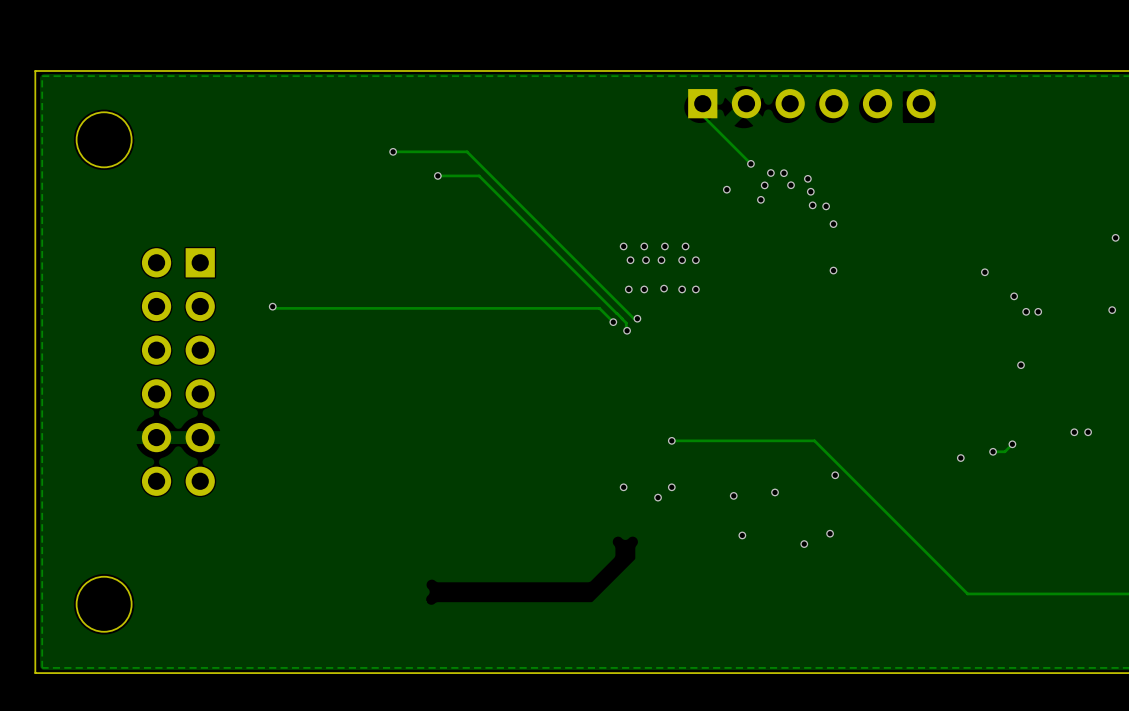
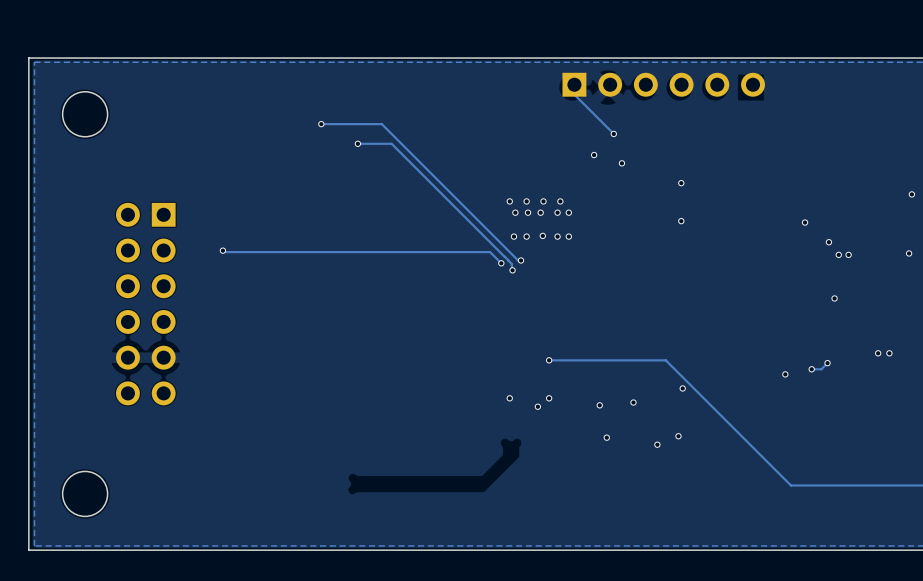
via: (770, 173) -> none
via: (783, 173) -> none
via: (807, 178) -> none
via: (764, 185) -> none
via: (791, 185) -> none
via: (810, 191) -> none
via: (812, 205) -> none
via: (826, 206) -> none

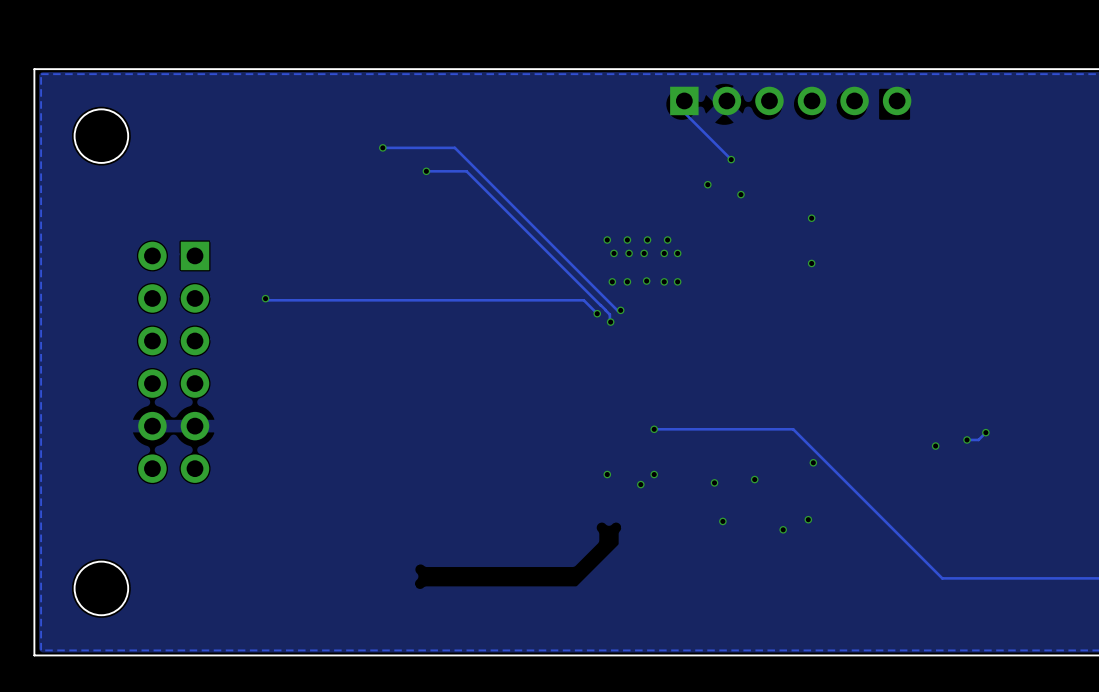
via: (911, 194) -> none
via: (805, 222) -> none
via: (828, 242) -> none
via: (909, 253) -> none
via: (838, 254) -> none
via: (848, 254) -> none
via: (834, 298) -> none
via: (878, 353) -> none
via: (889, 353) -> none

